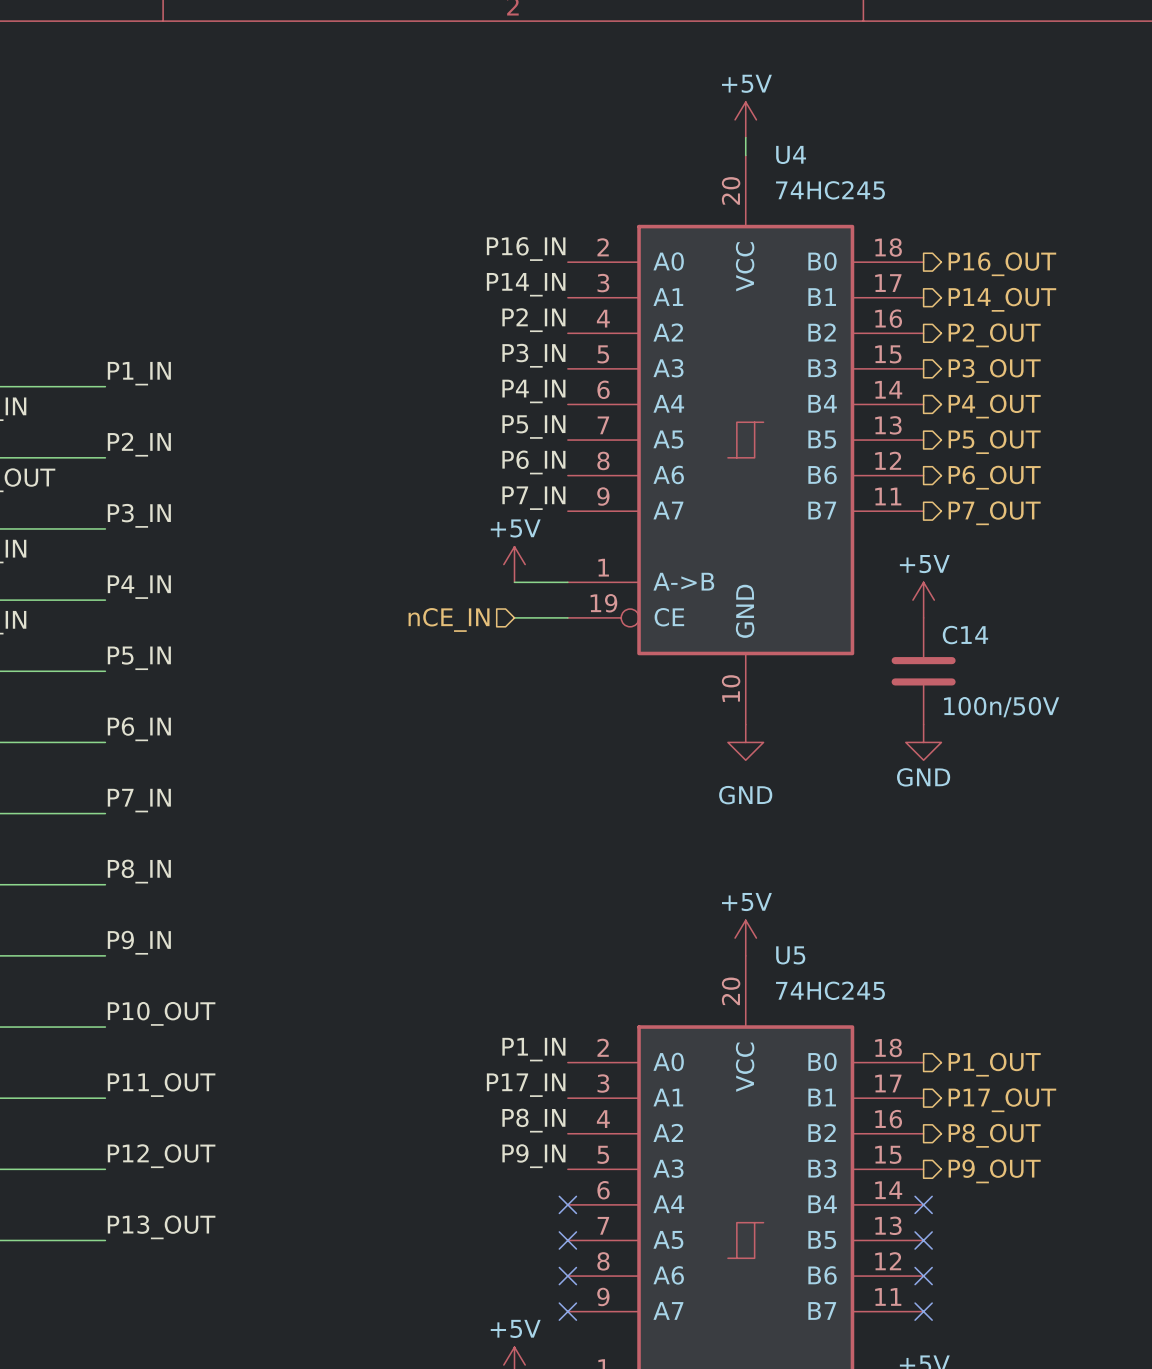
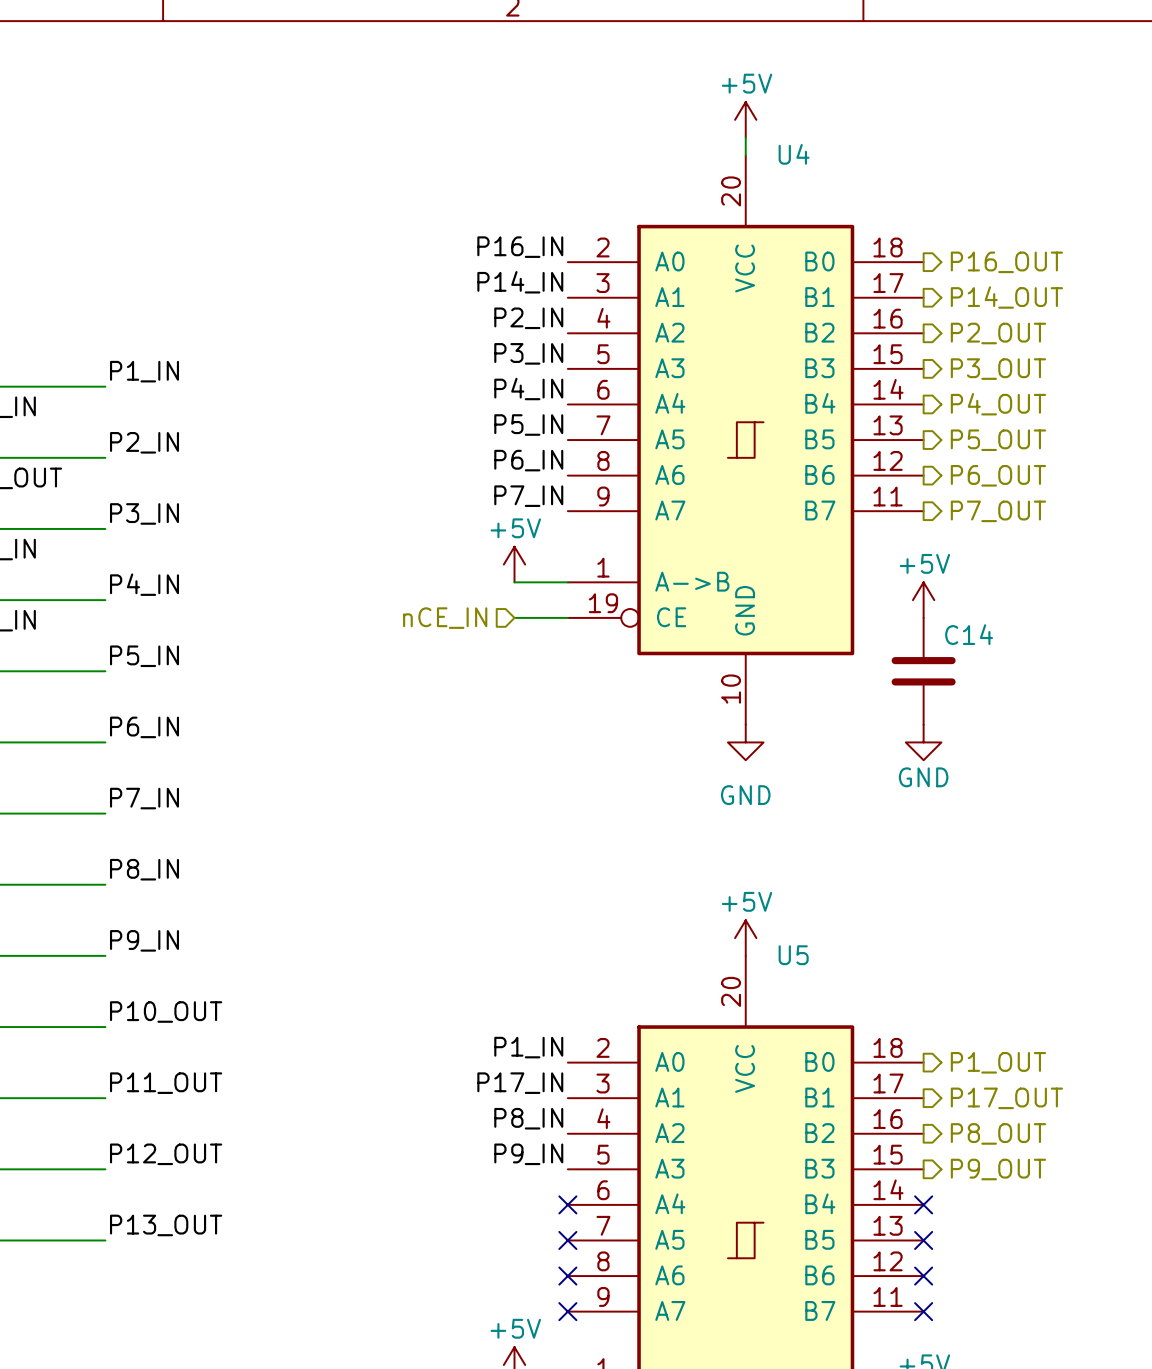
U4 value: 74HC245 (830, 190) -> none
C14 value: 100n/50V (1001, 707) -> none
U5 value: 74HC245 (830, 990) -> none

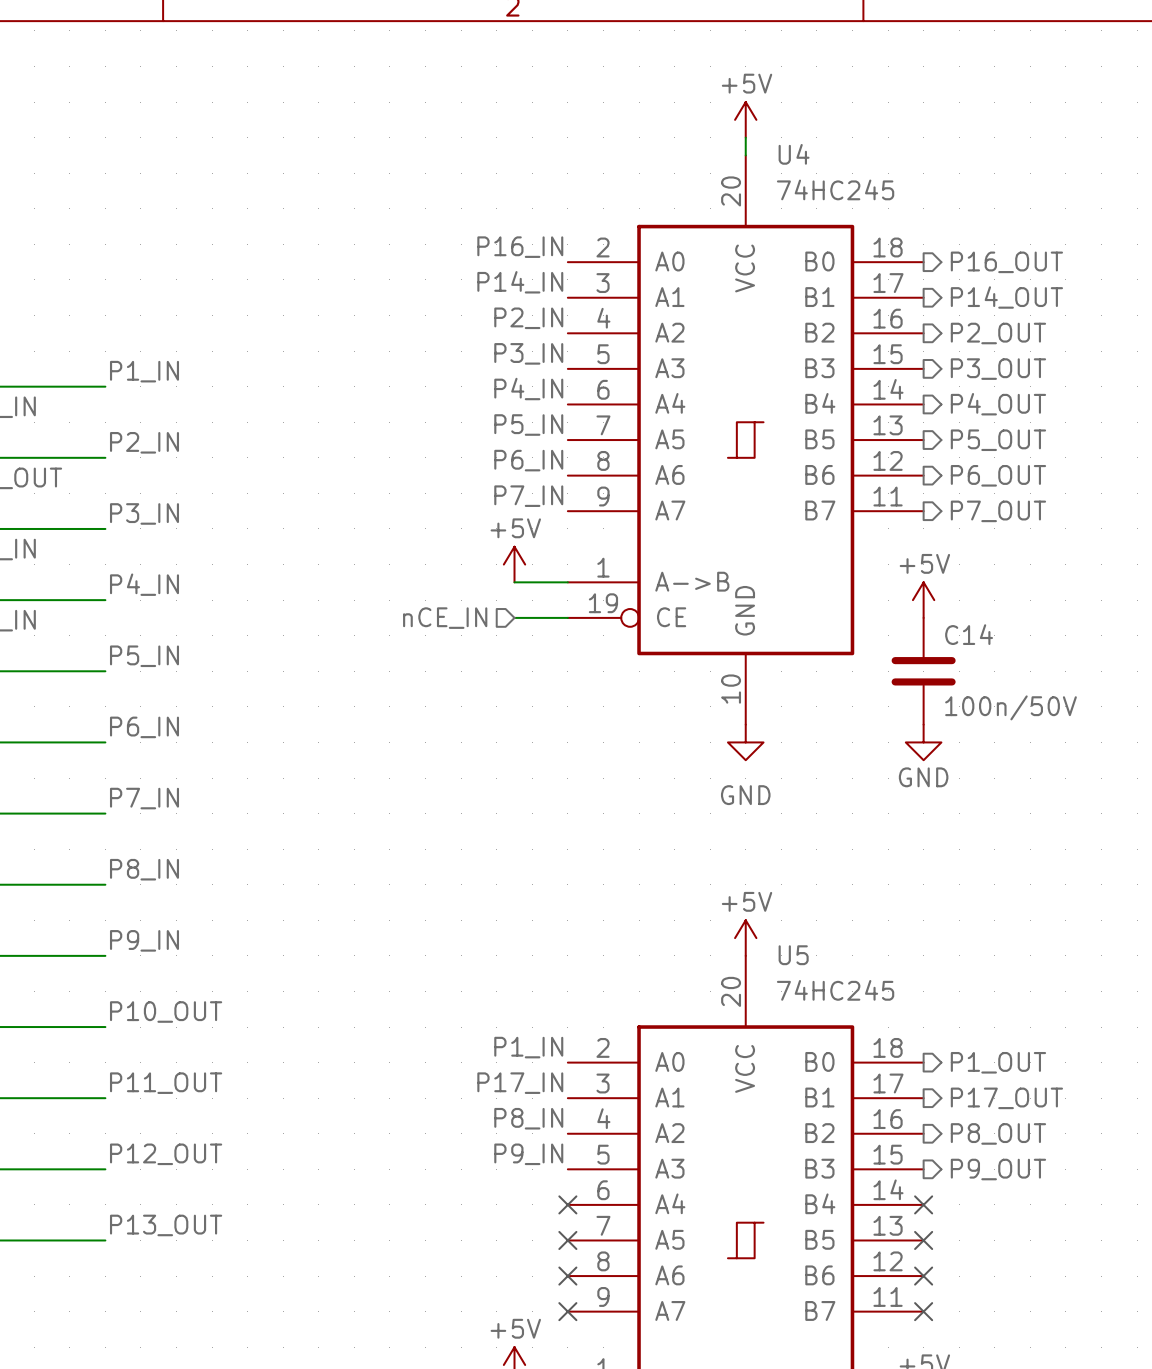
U4 value: none -> 74HC245 (835, 189)
C14 value: none -> 100n/50V (1011, 707)
U5 value: none -> 74HC245 (835, 990)

